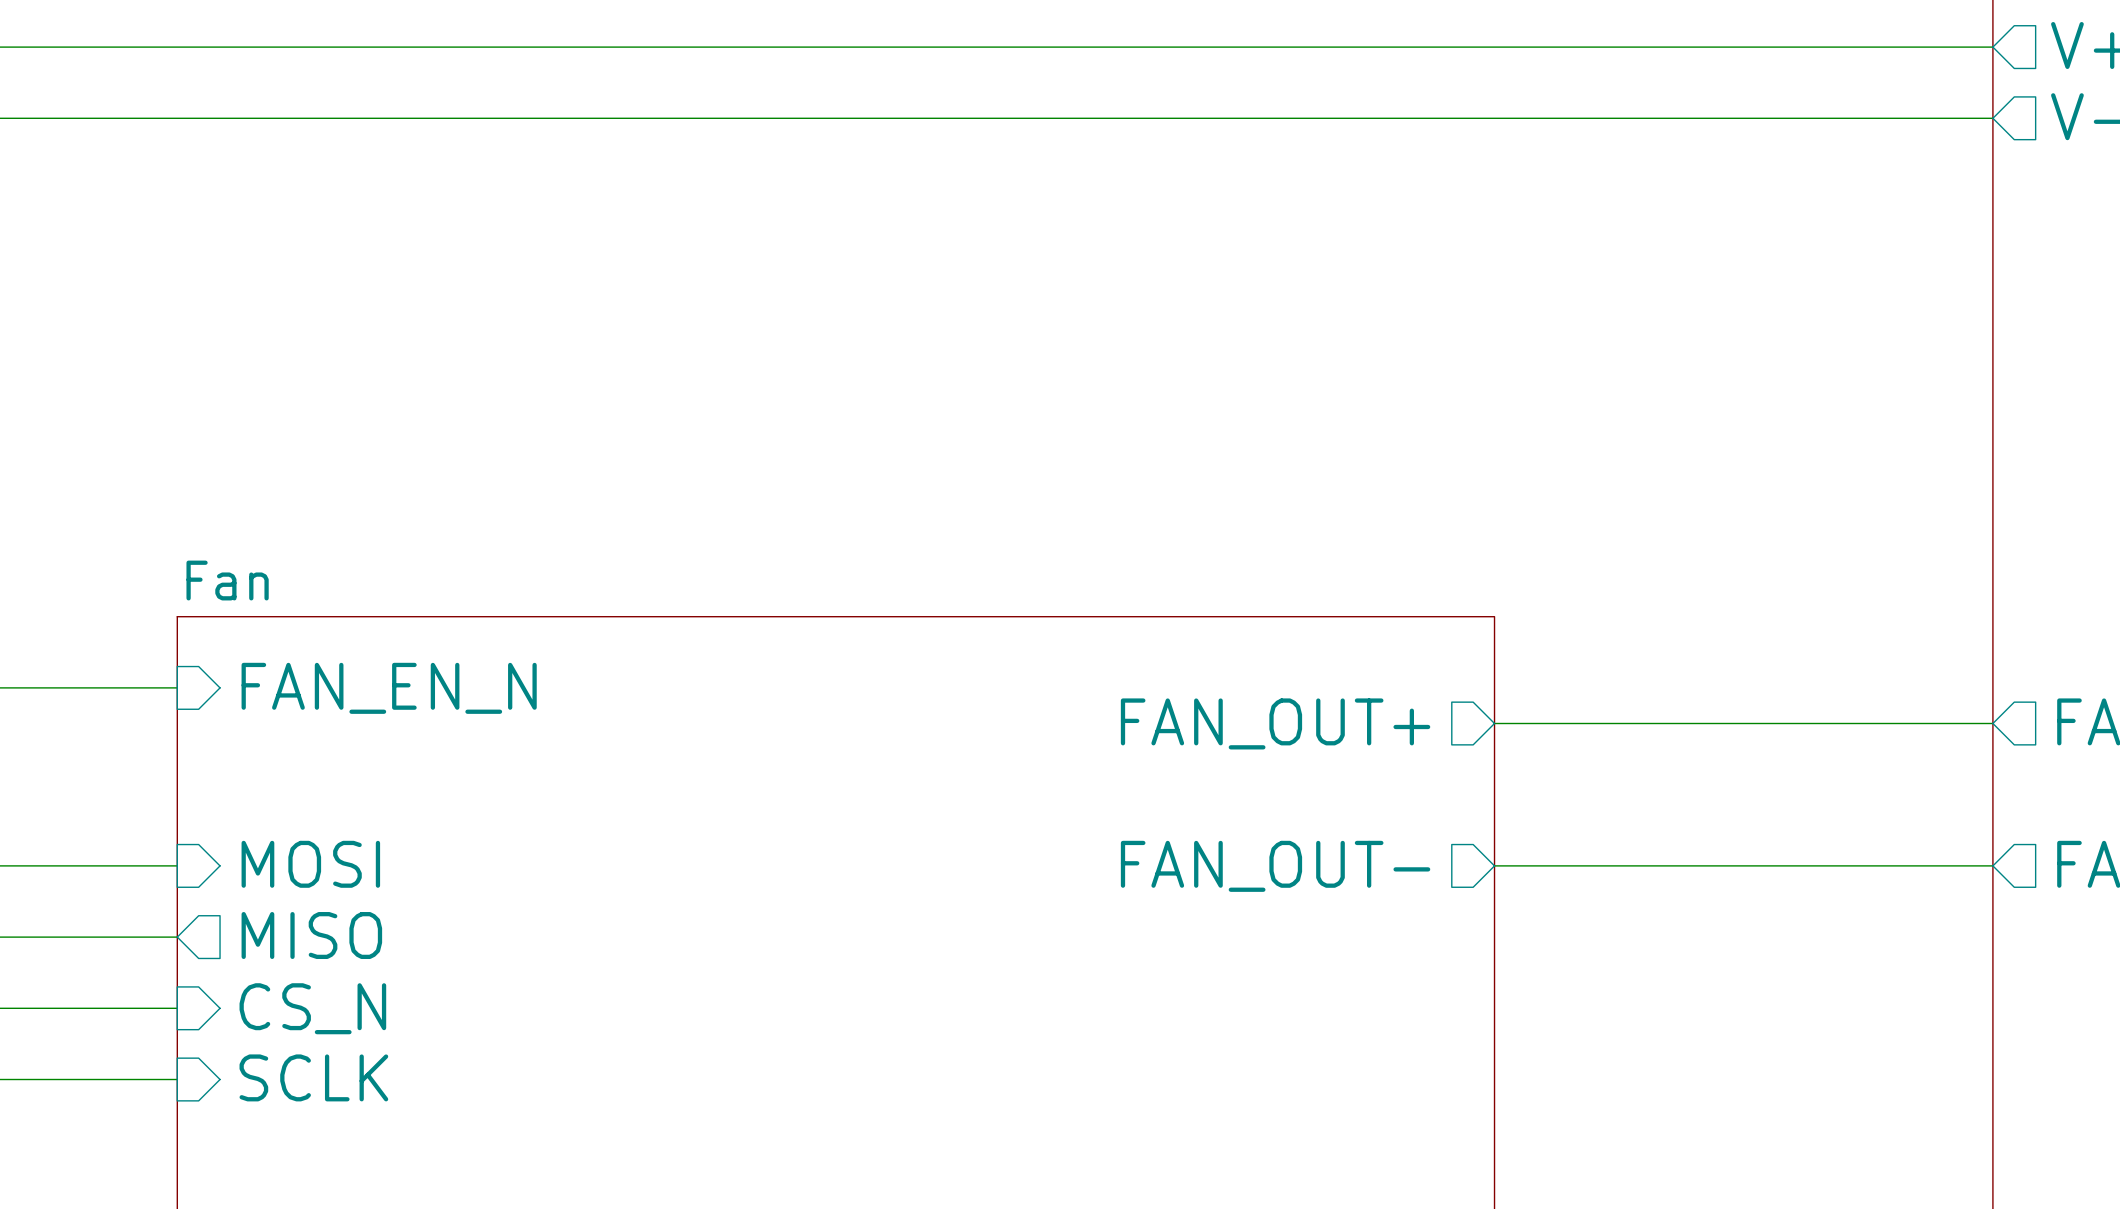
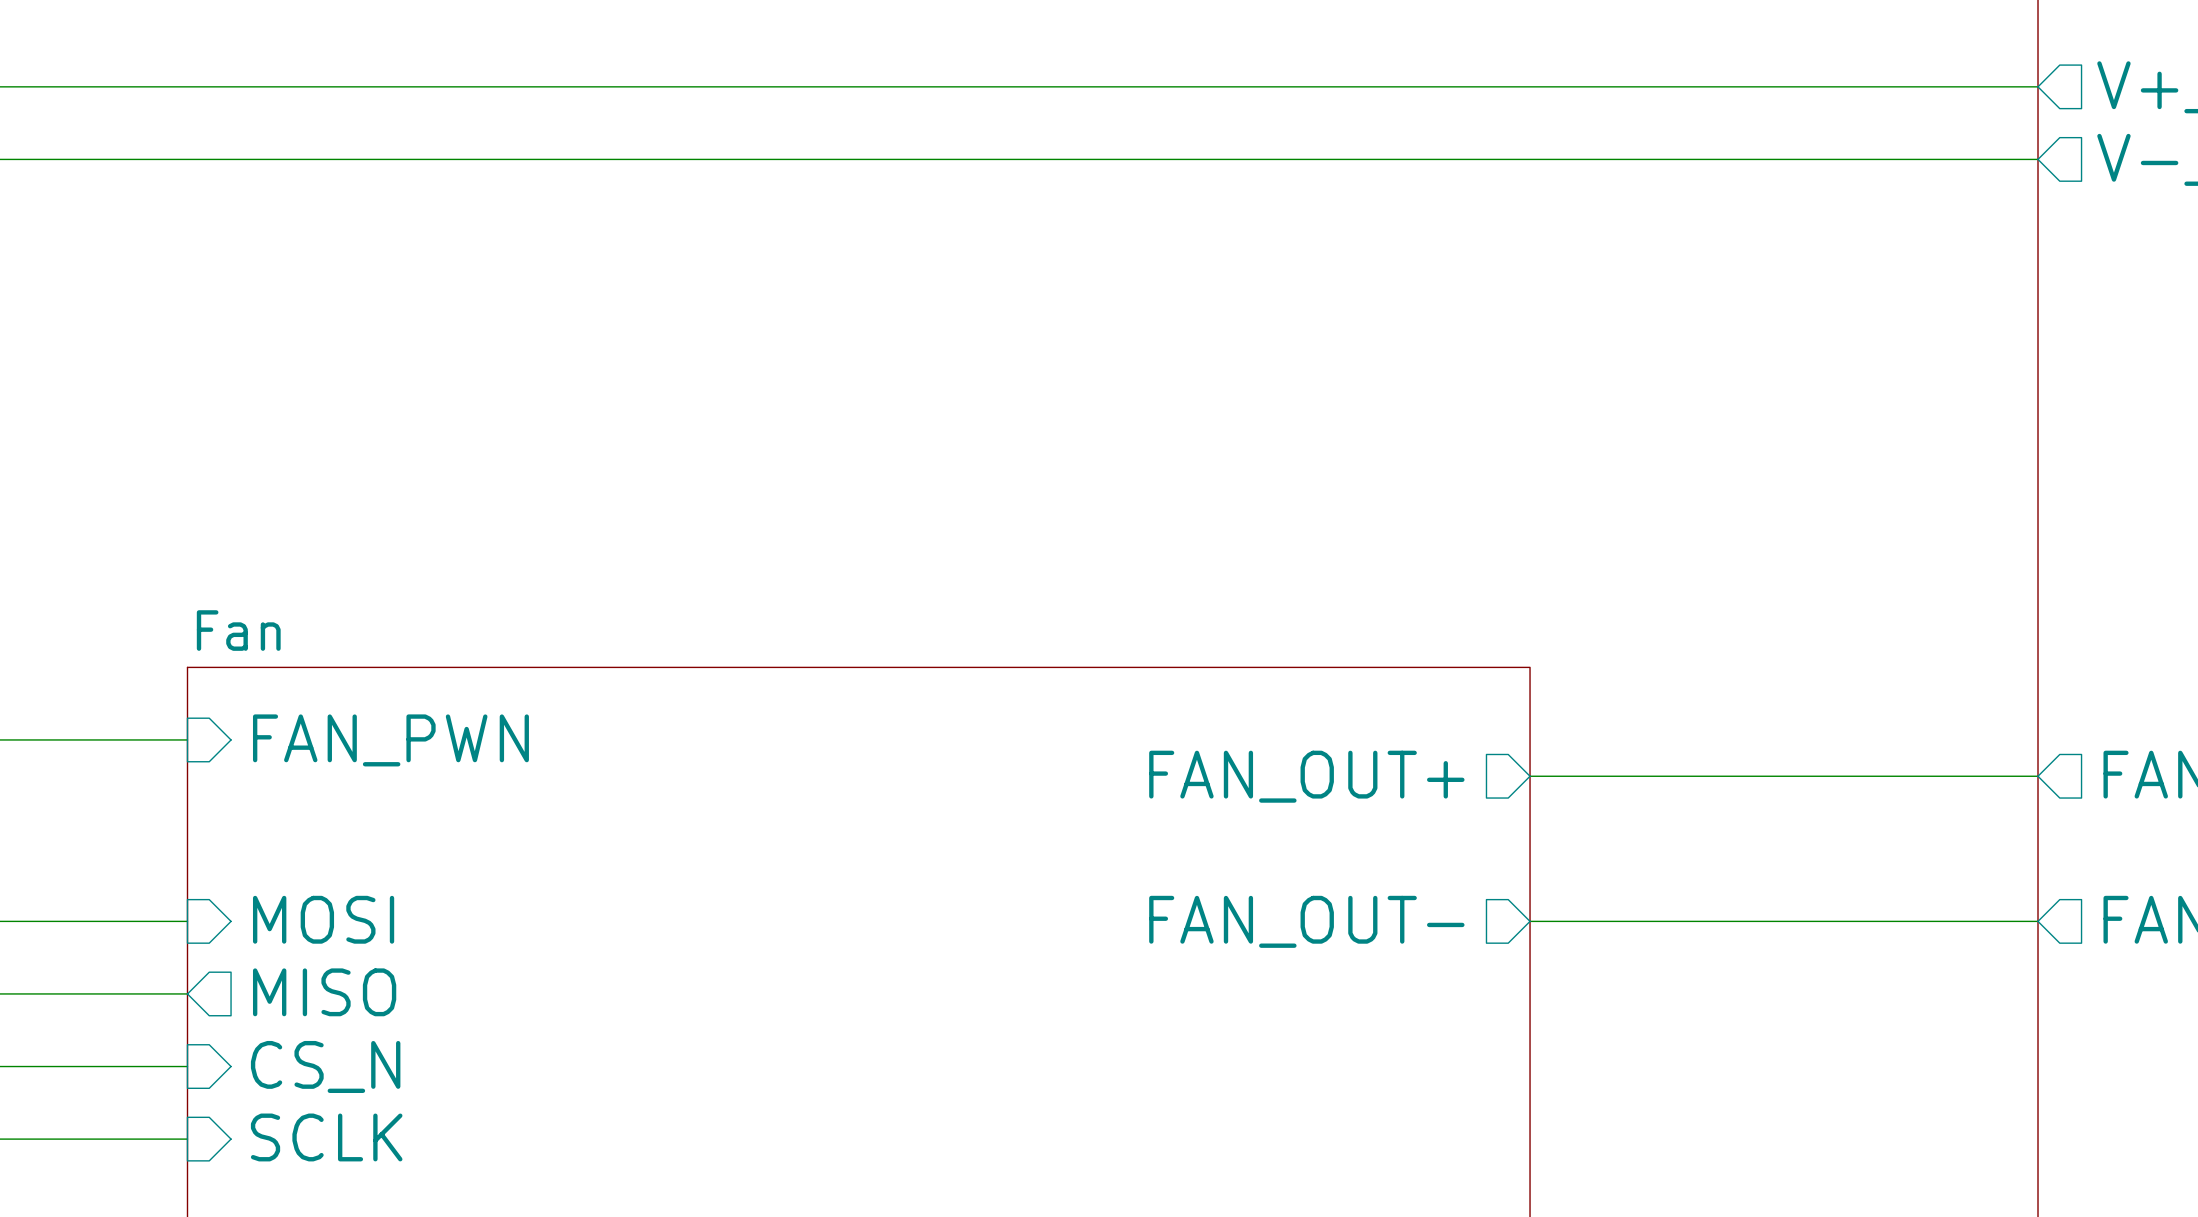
sheet pin: FAN_EN_N (389, 688) -> FAN_PWN (390, 740)

